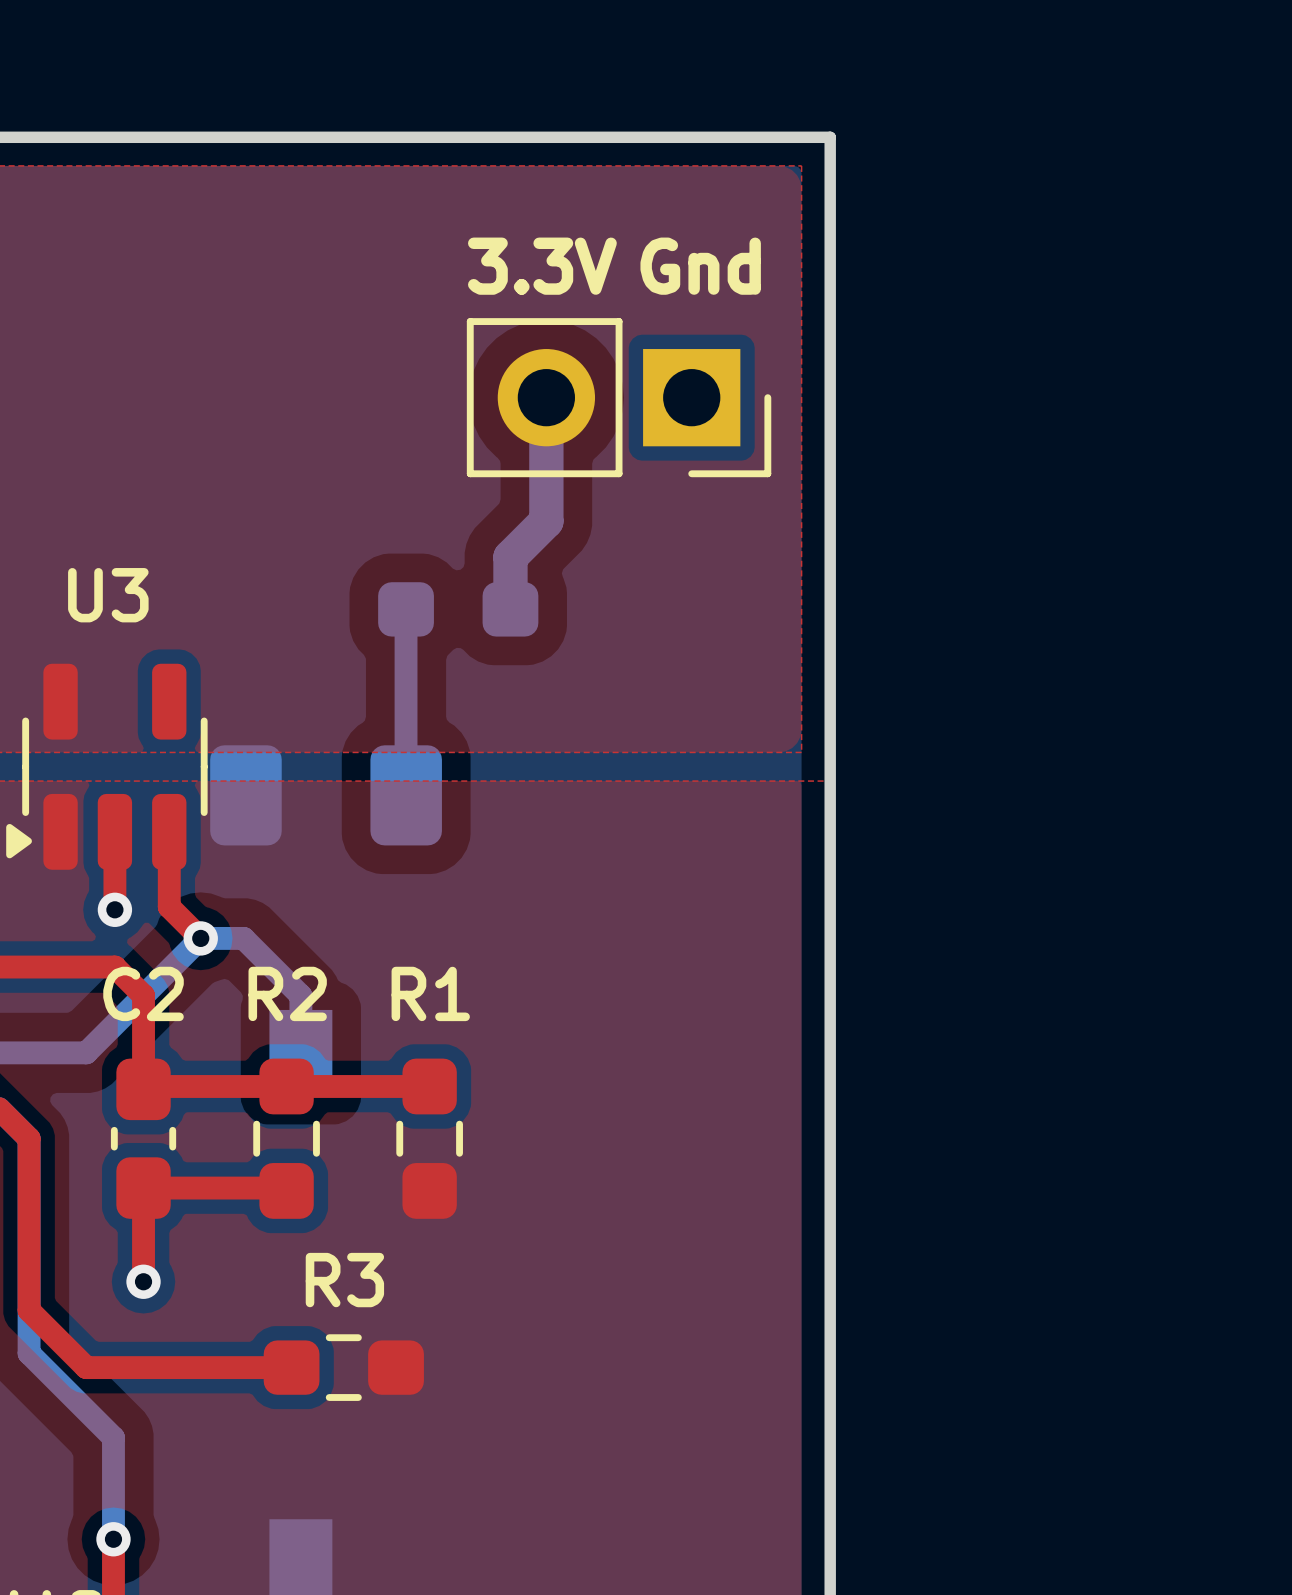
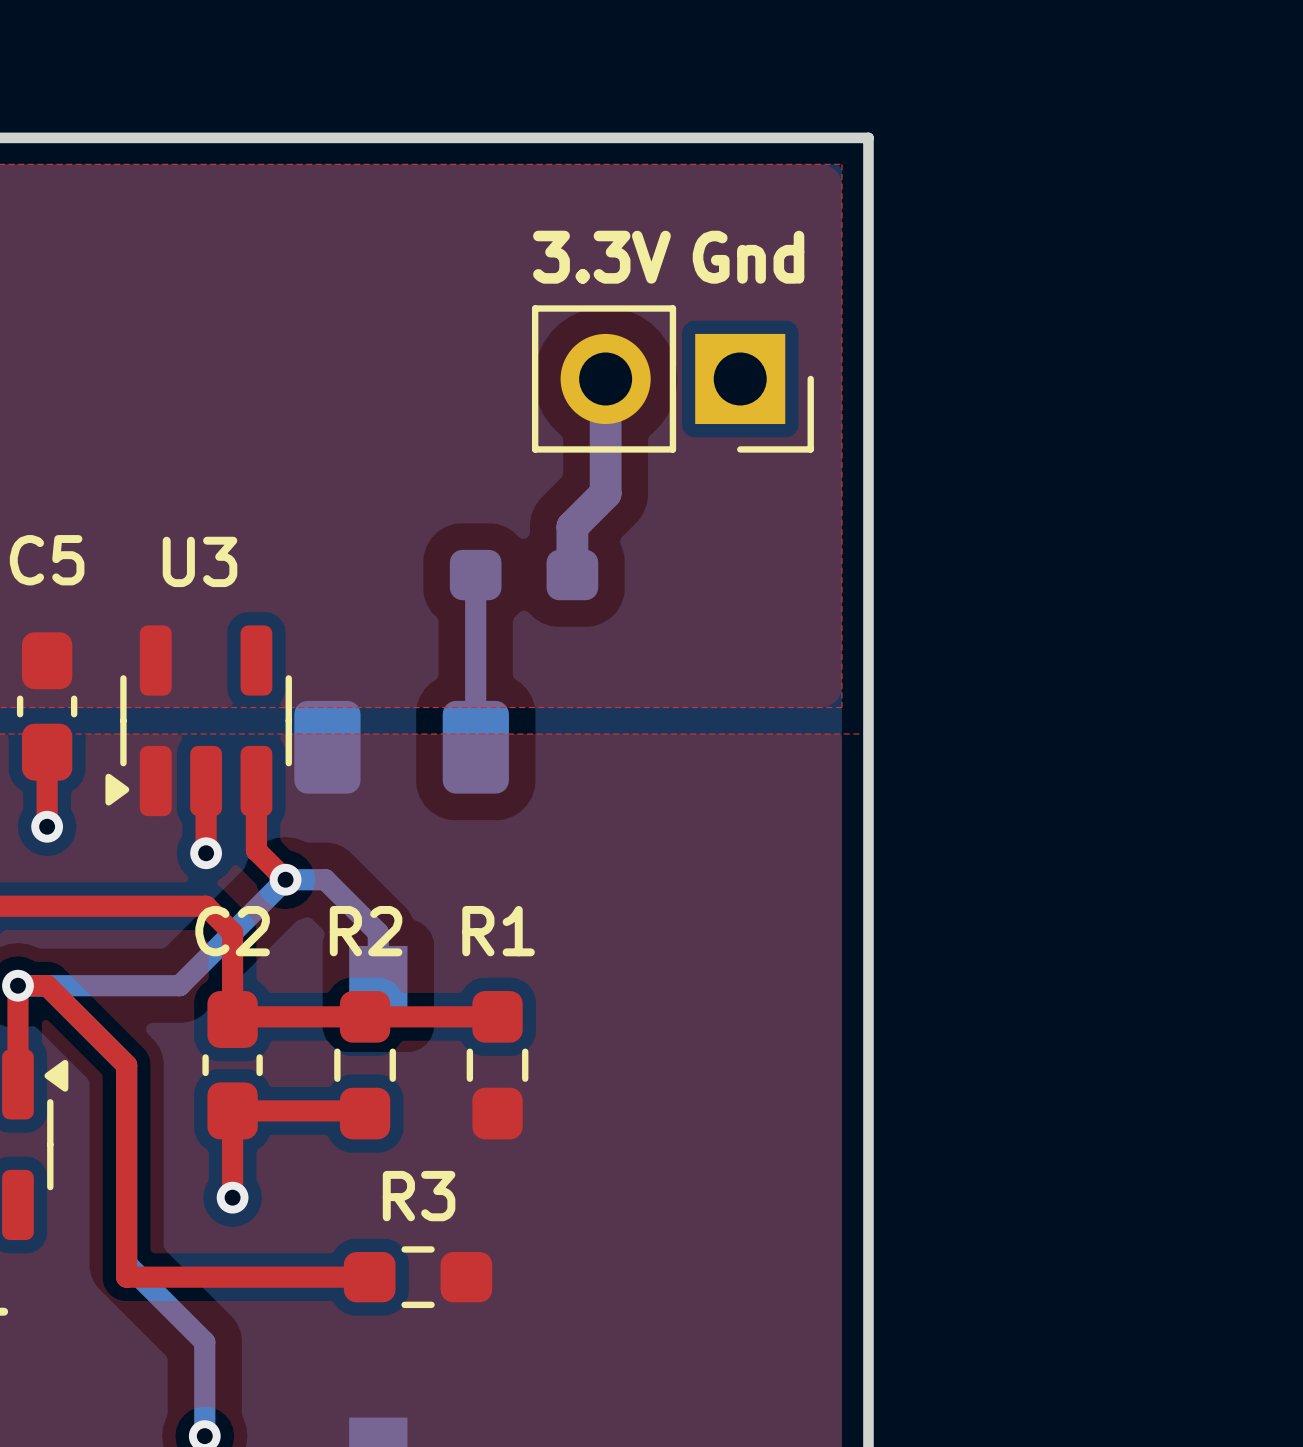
top track: (29, 1310) (86, 1367) -> (126, 1224) (126, 1277) (179, 1277)

